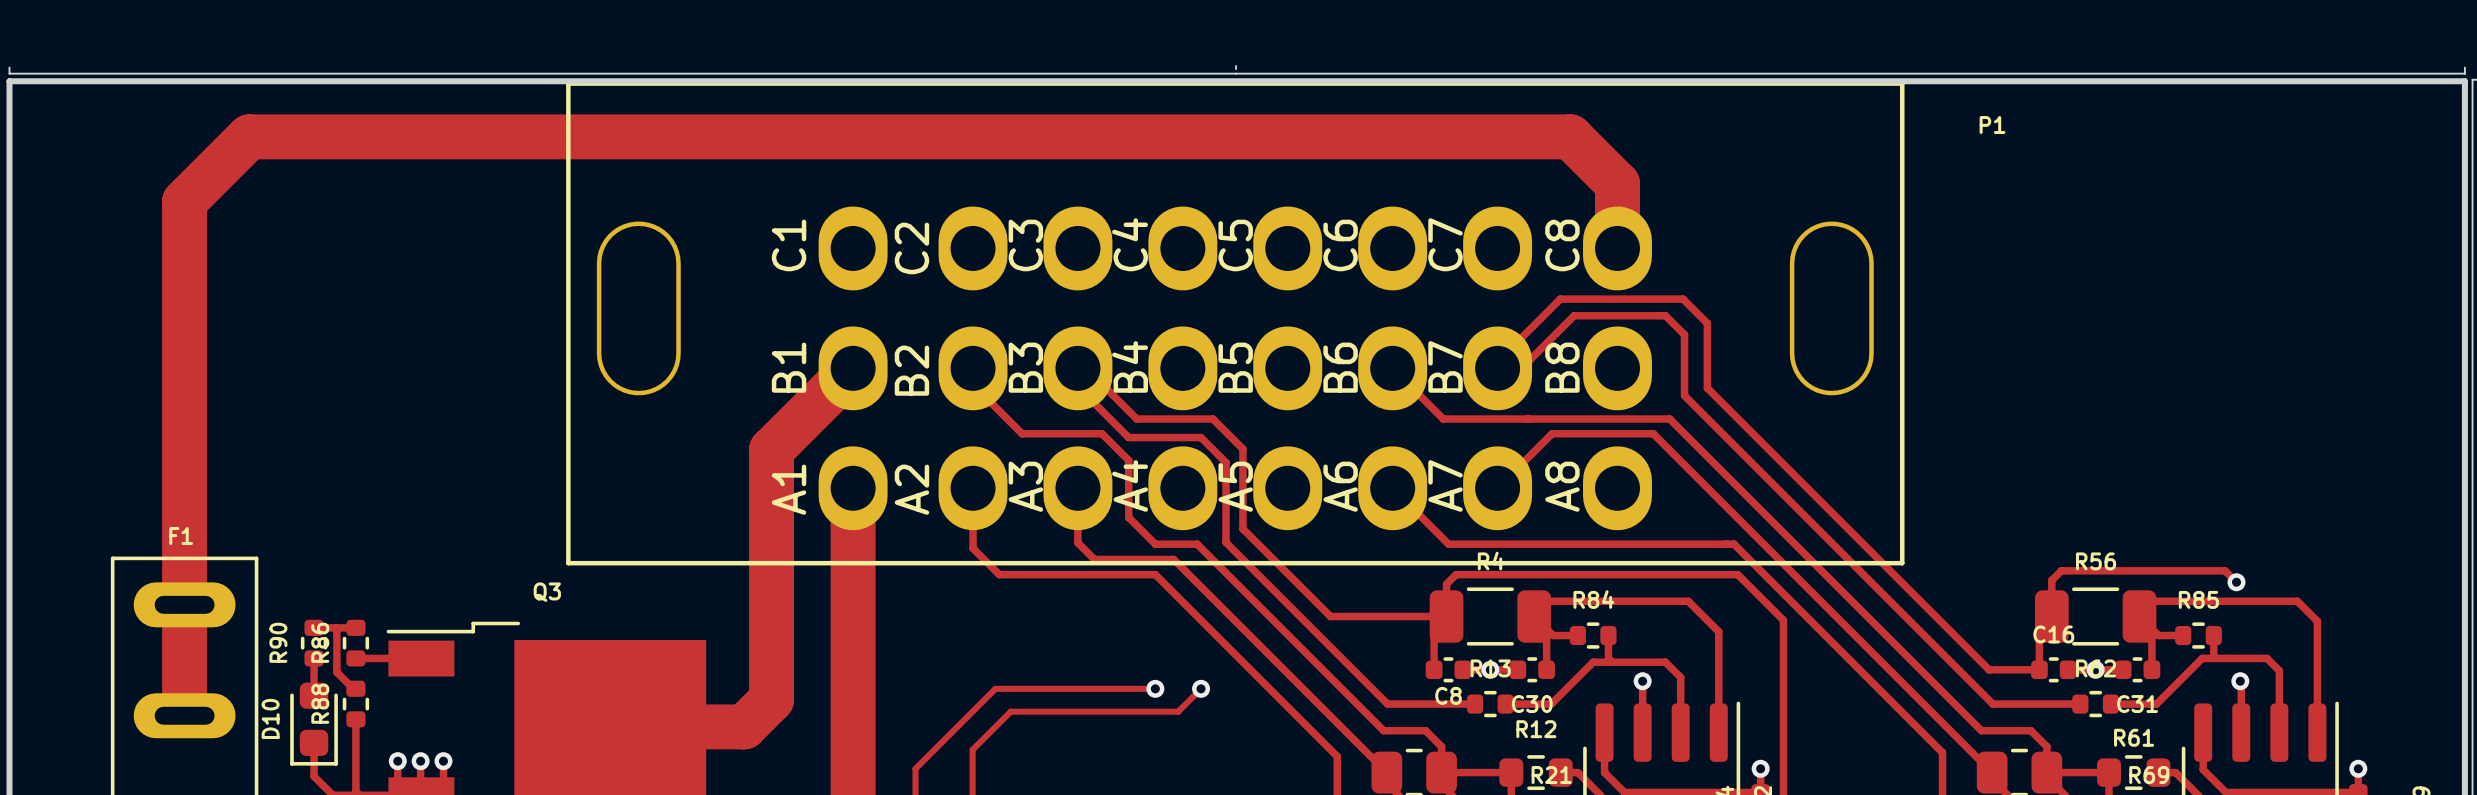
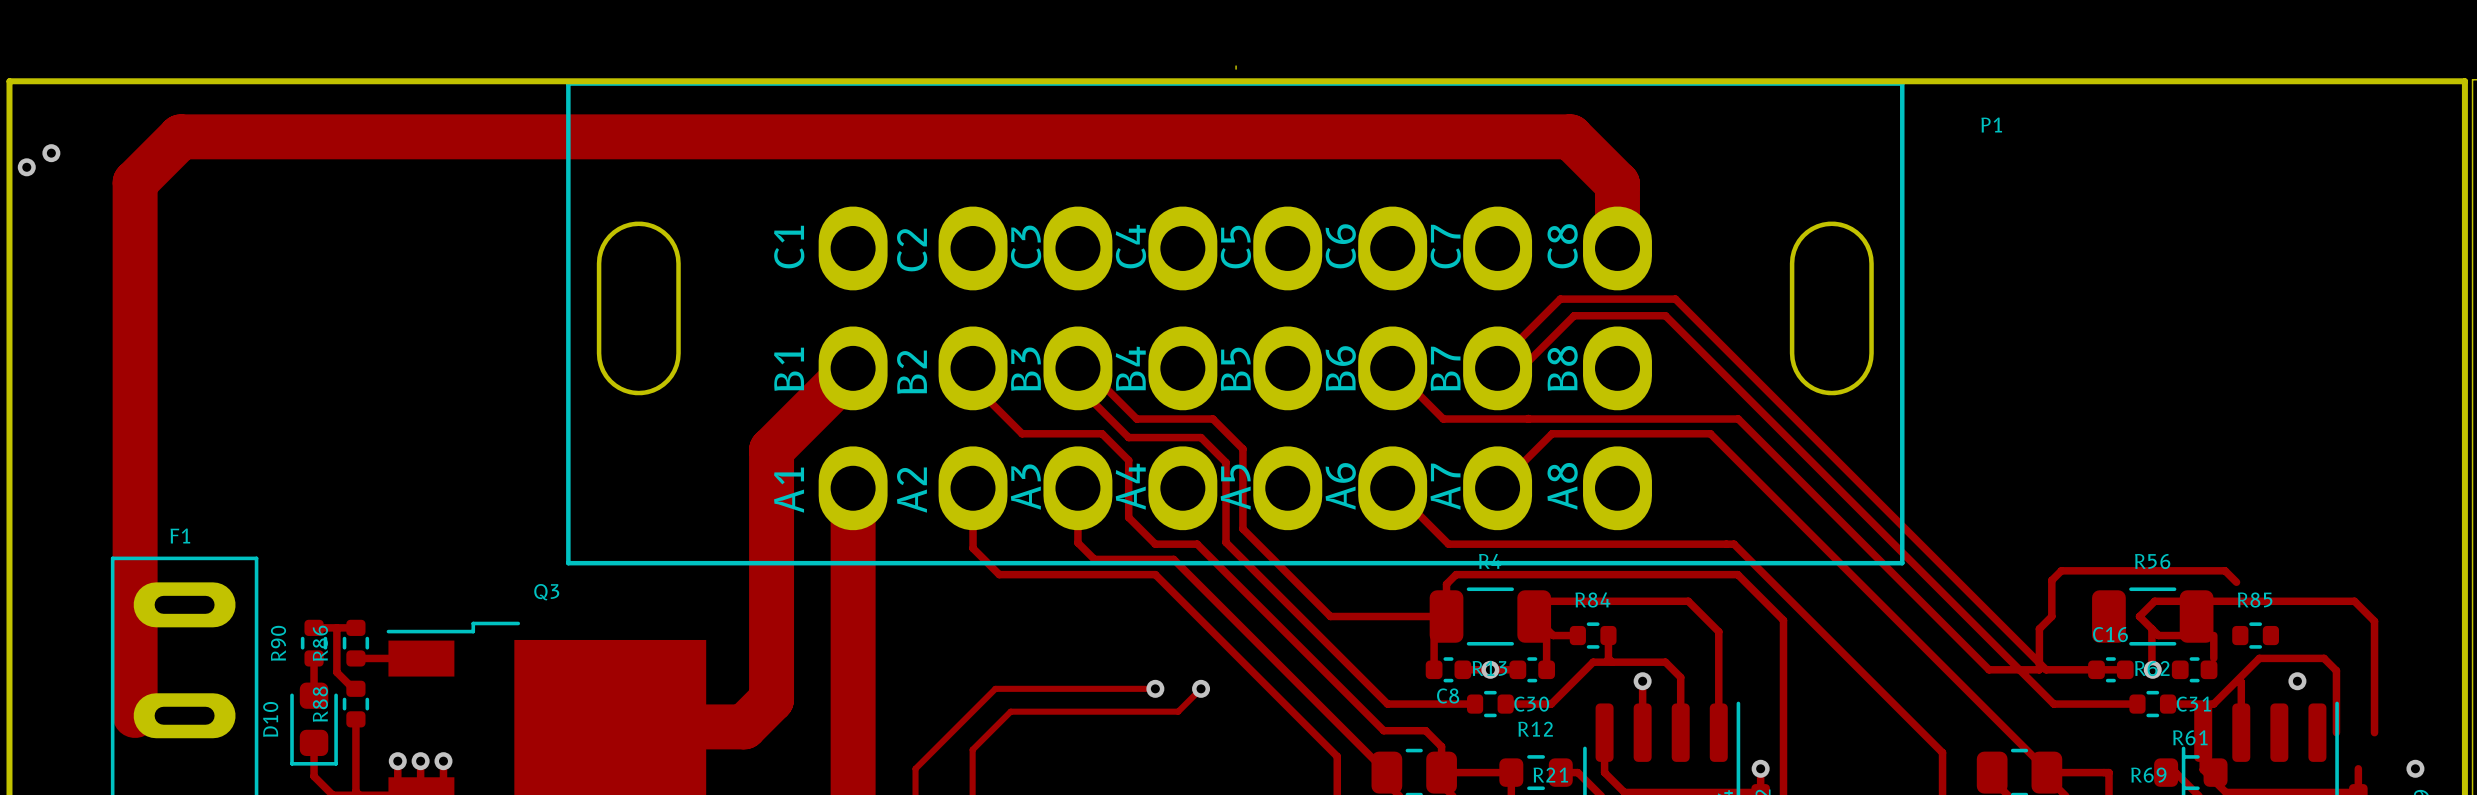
board edge: (9, 67) (9, 73) (2464, 73) (2464, 67) -> none
track: (249, 136) (184, 201) (184, 715) -> (249, 136) (180, 136) (135, 182) (135, 715)
via: none -> (51, 153)
via: none -> (26, 167)
track: (1675, 299) (1683, 299) (1707, 323) (1707, 388) (1738, 419) -> (1669, 419) (1738, 419)
track: none -> (1675, 299) (2046, 669) (2068, 669)
track: (1684, 334) (1684, 395) (1992, 704) (2053, 704) -> (1684, 334) (2053, 704)
track: (1669, 419) (1981, 730) (2030, 730) (2046, 746) (2046, 777) (2049, 779) -> (1653, 433) (1710, 433) (2049, 772) (2049, 779)
track: (1653, 433) (1992, 772) (1985, 772) -> none
via: (2236, 582) -> none
track: (2297, 601) (2317, 621) (2317, 732) -> (2297, 601) (2354, 601) (2374, 621) (2374, 732)
R56 position: (2095, 616) -> (2152, 616)
R85 position: (2198, 635) -> (2255, 635)
track: (2259, 658) (2202, 658) (2156, 704) (2137, 704) -> (2259, 658) (2213, 704) (2168, 704)
track: (2266, 658) (2279, 670) (2279, 732) -> (2266, 658) (2324, 658) (2336, 670) (2336, 732)
C16 position: (2053, 669) -> (2110, 669)
via: (2095, 669) -> none
C31 position: (2137, 669) -> (2194, 669)
via: none -> (2152, 669)
via: (2240, 681) -> none
via: none -> (2297, 681)
track: none -> (2080, 704) (2110, 704)
R62 position: (2095, 704) -> (2152, 704)
via: (2358, 768) -> none
via: none -> (2415, 768)
R61 position: (2133, 772) -> (2190, 772)

